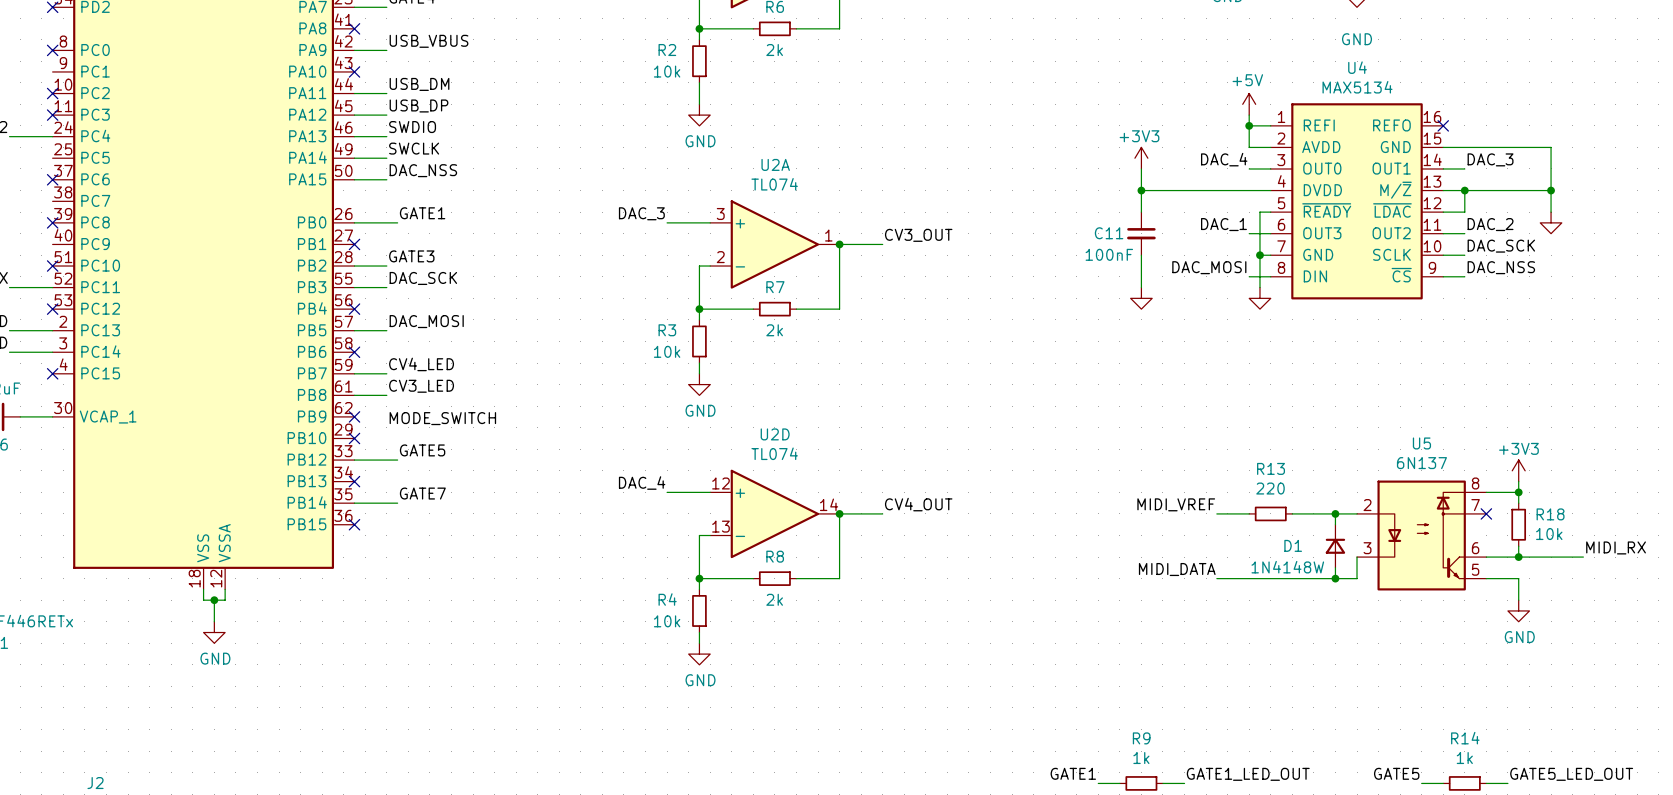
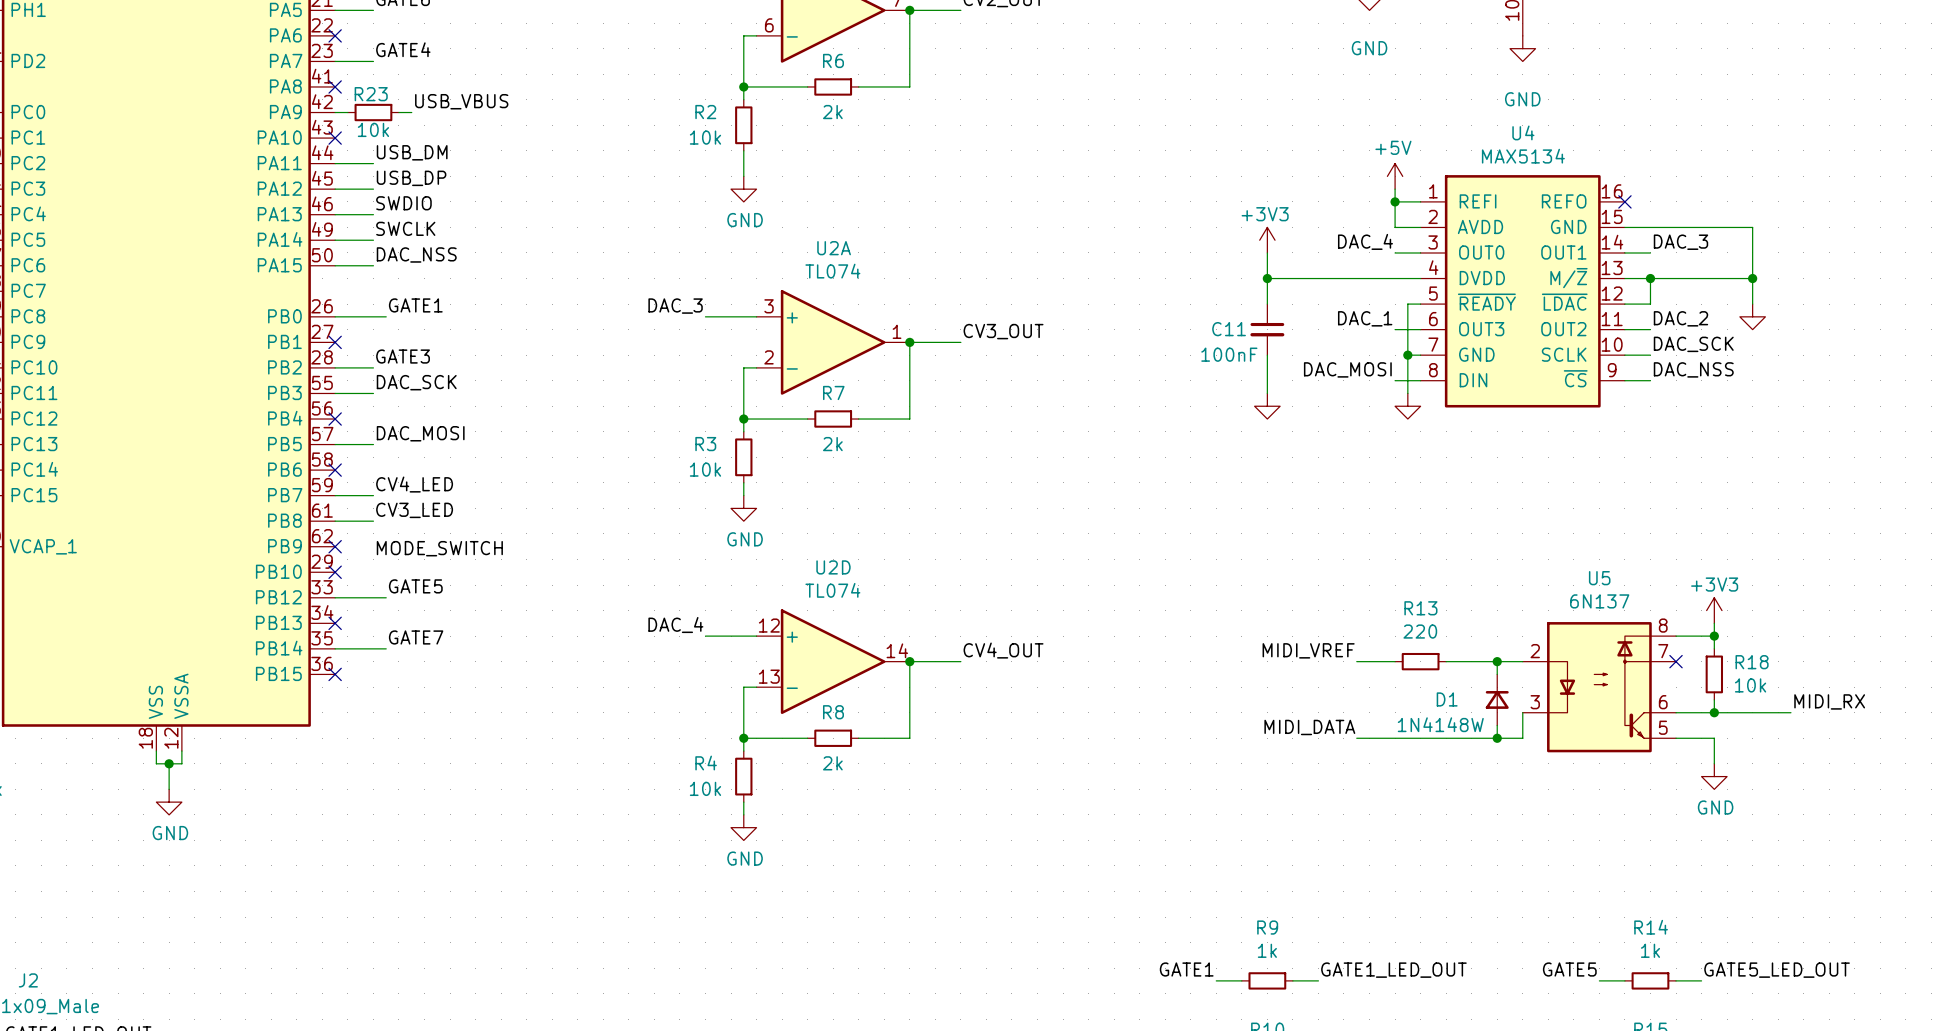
label position: USB_VBUS (429, 41) -> USB_VBUS (461, 101)
wire: (365, 50) (386, 50) -> none
R23: none -> 10k (373, 112)
wire: none -> (398, 112) (411, 112)

